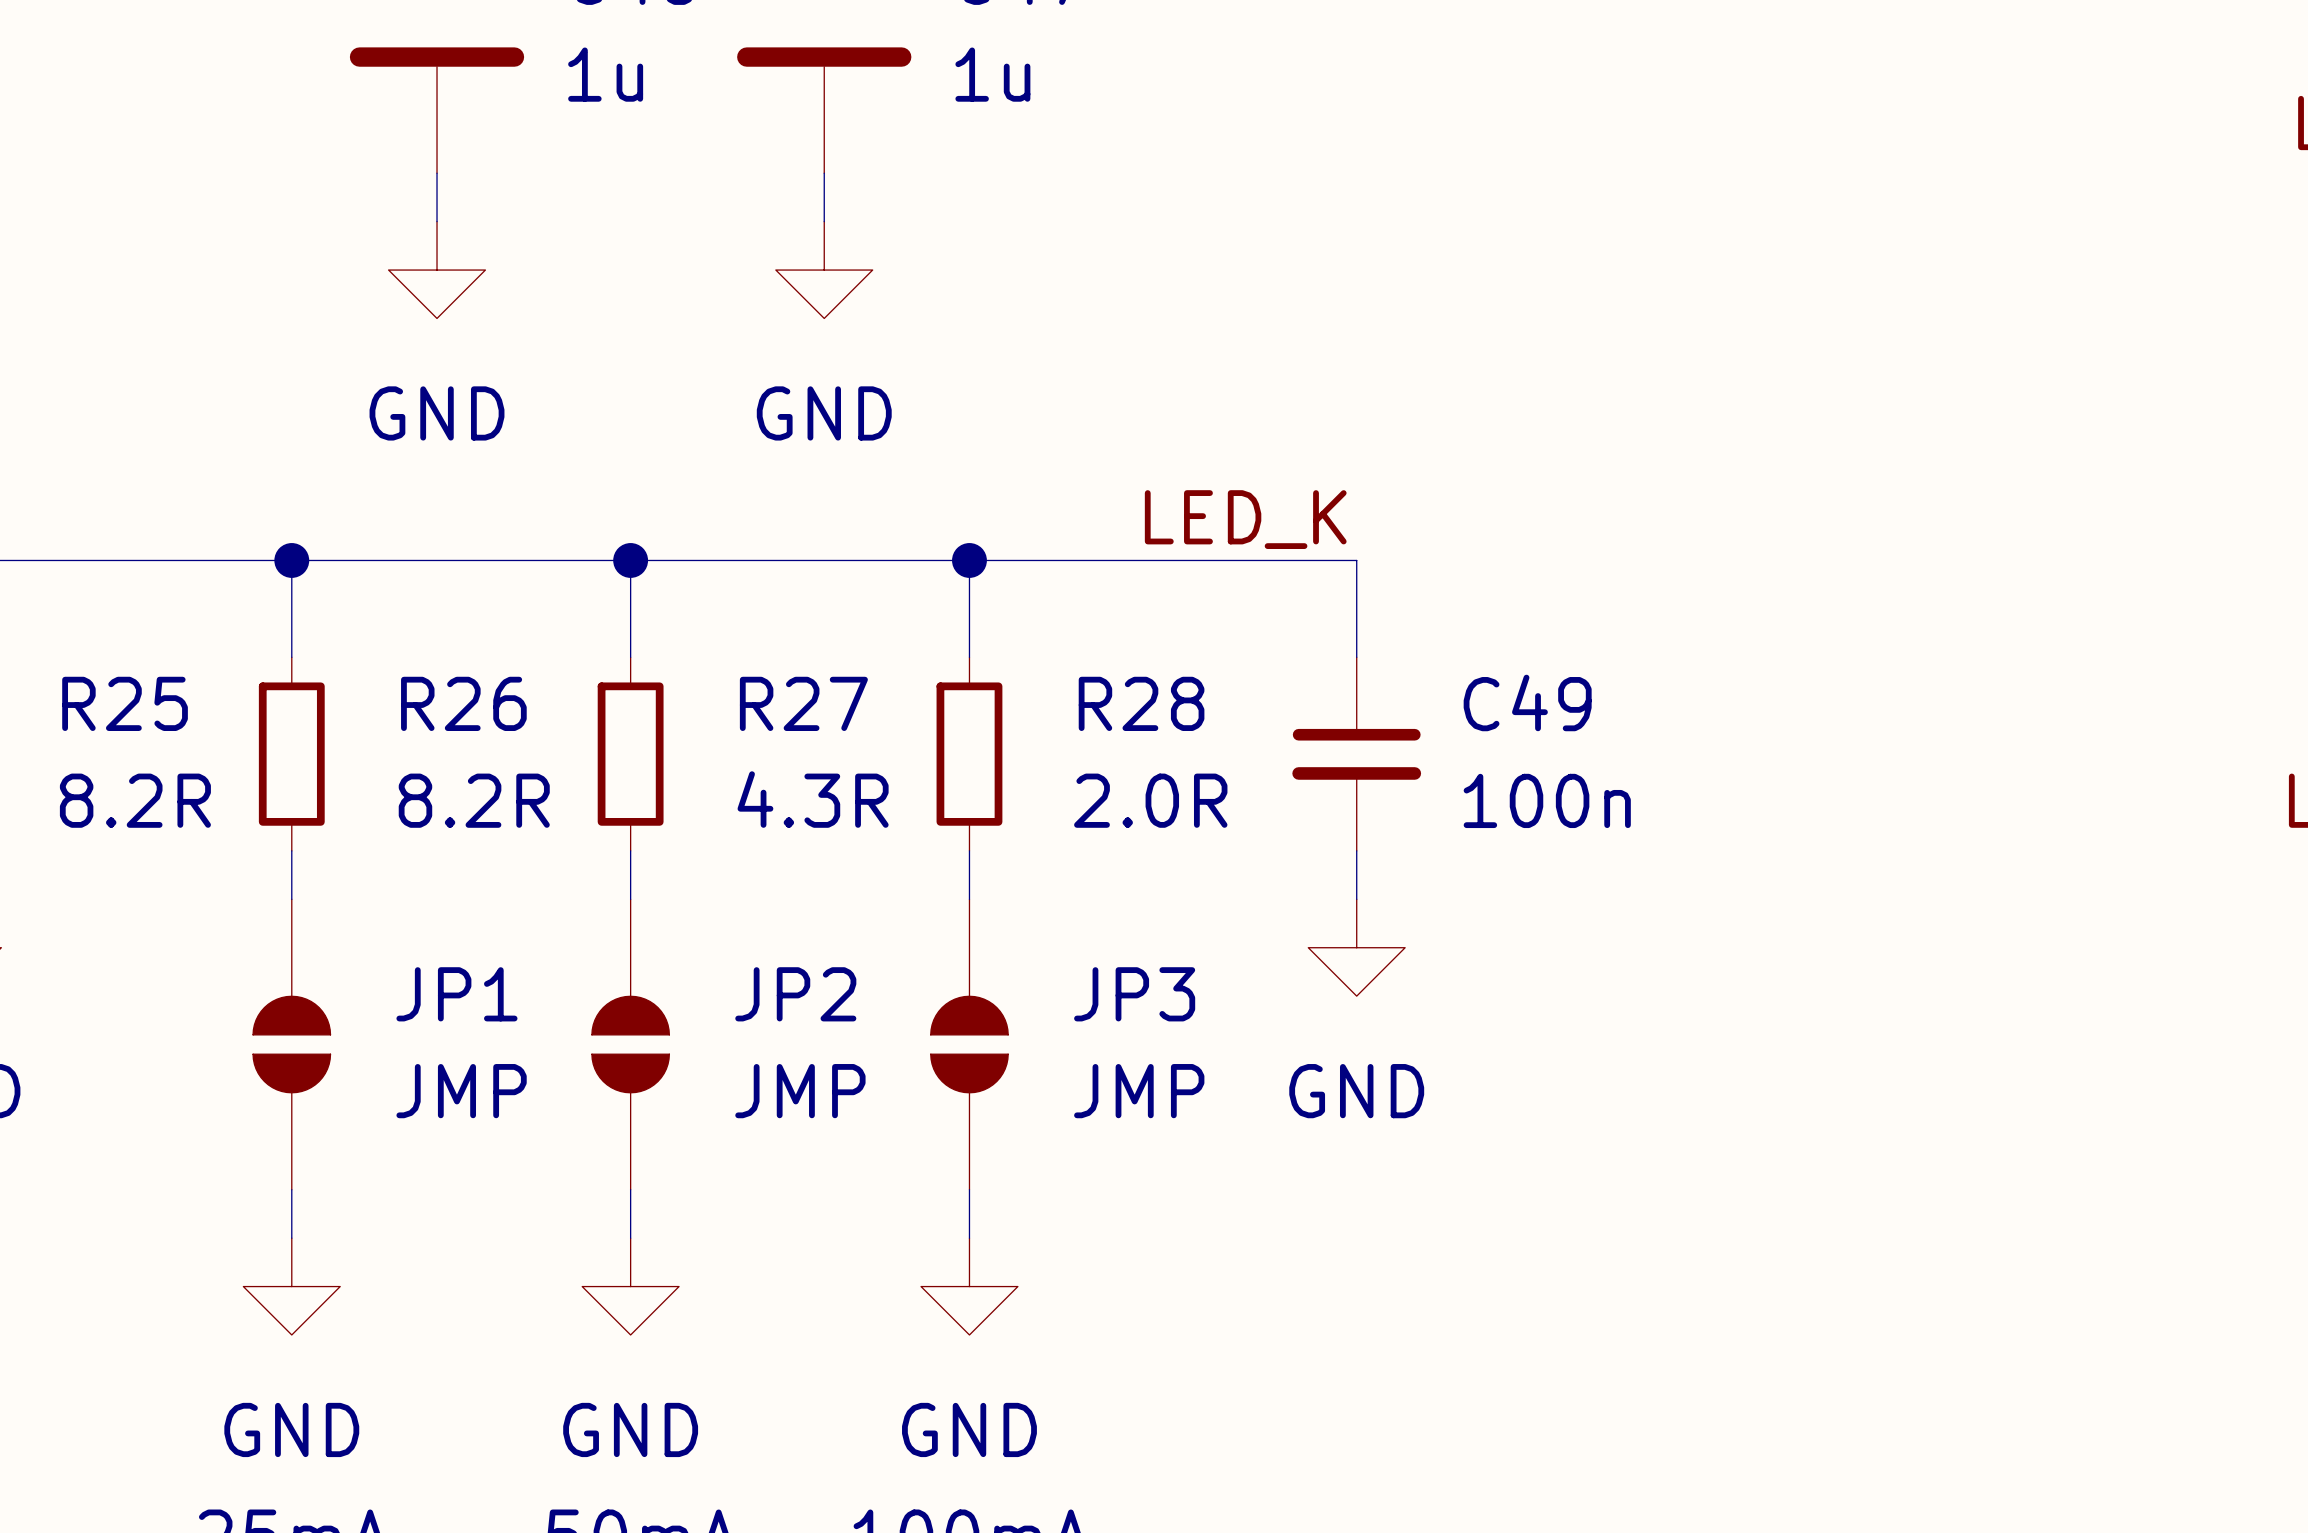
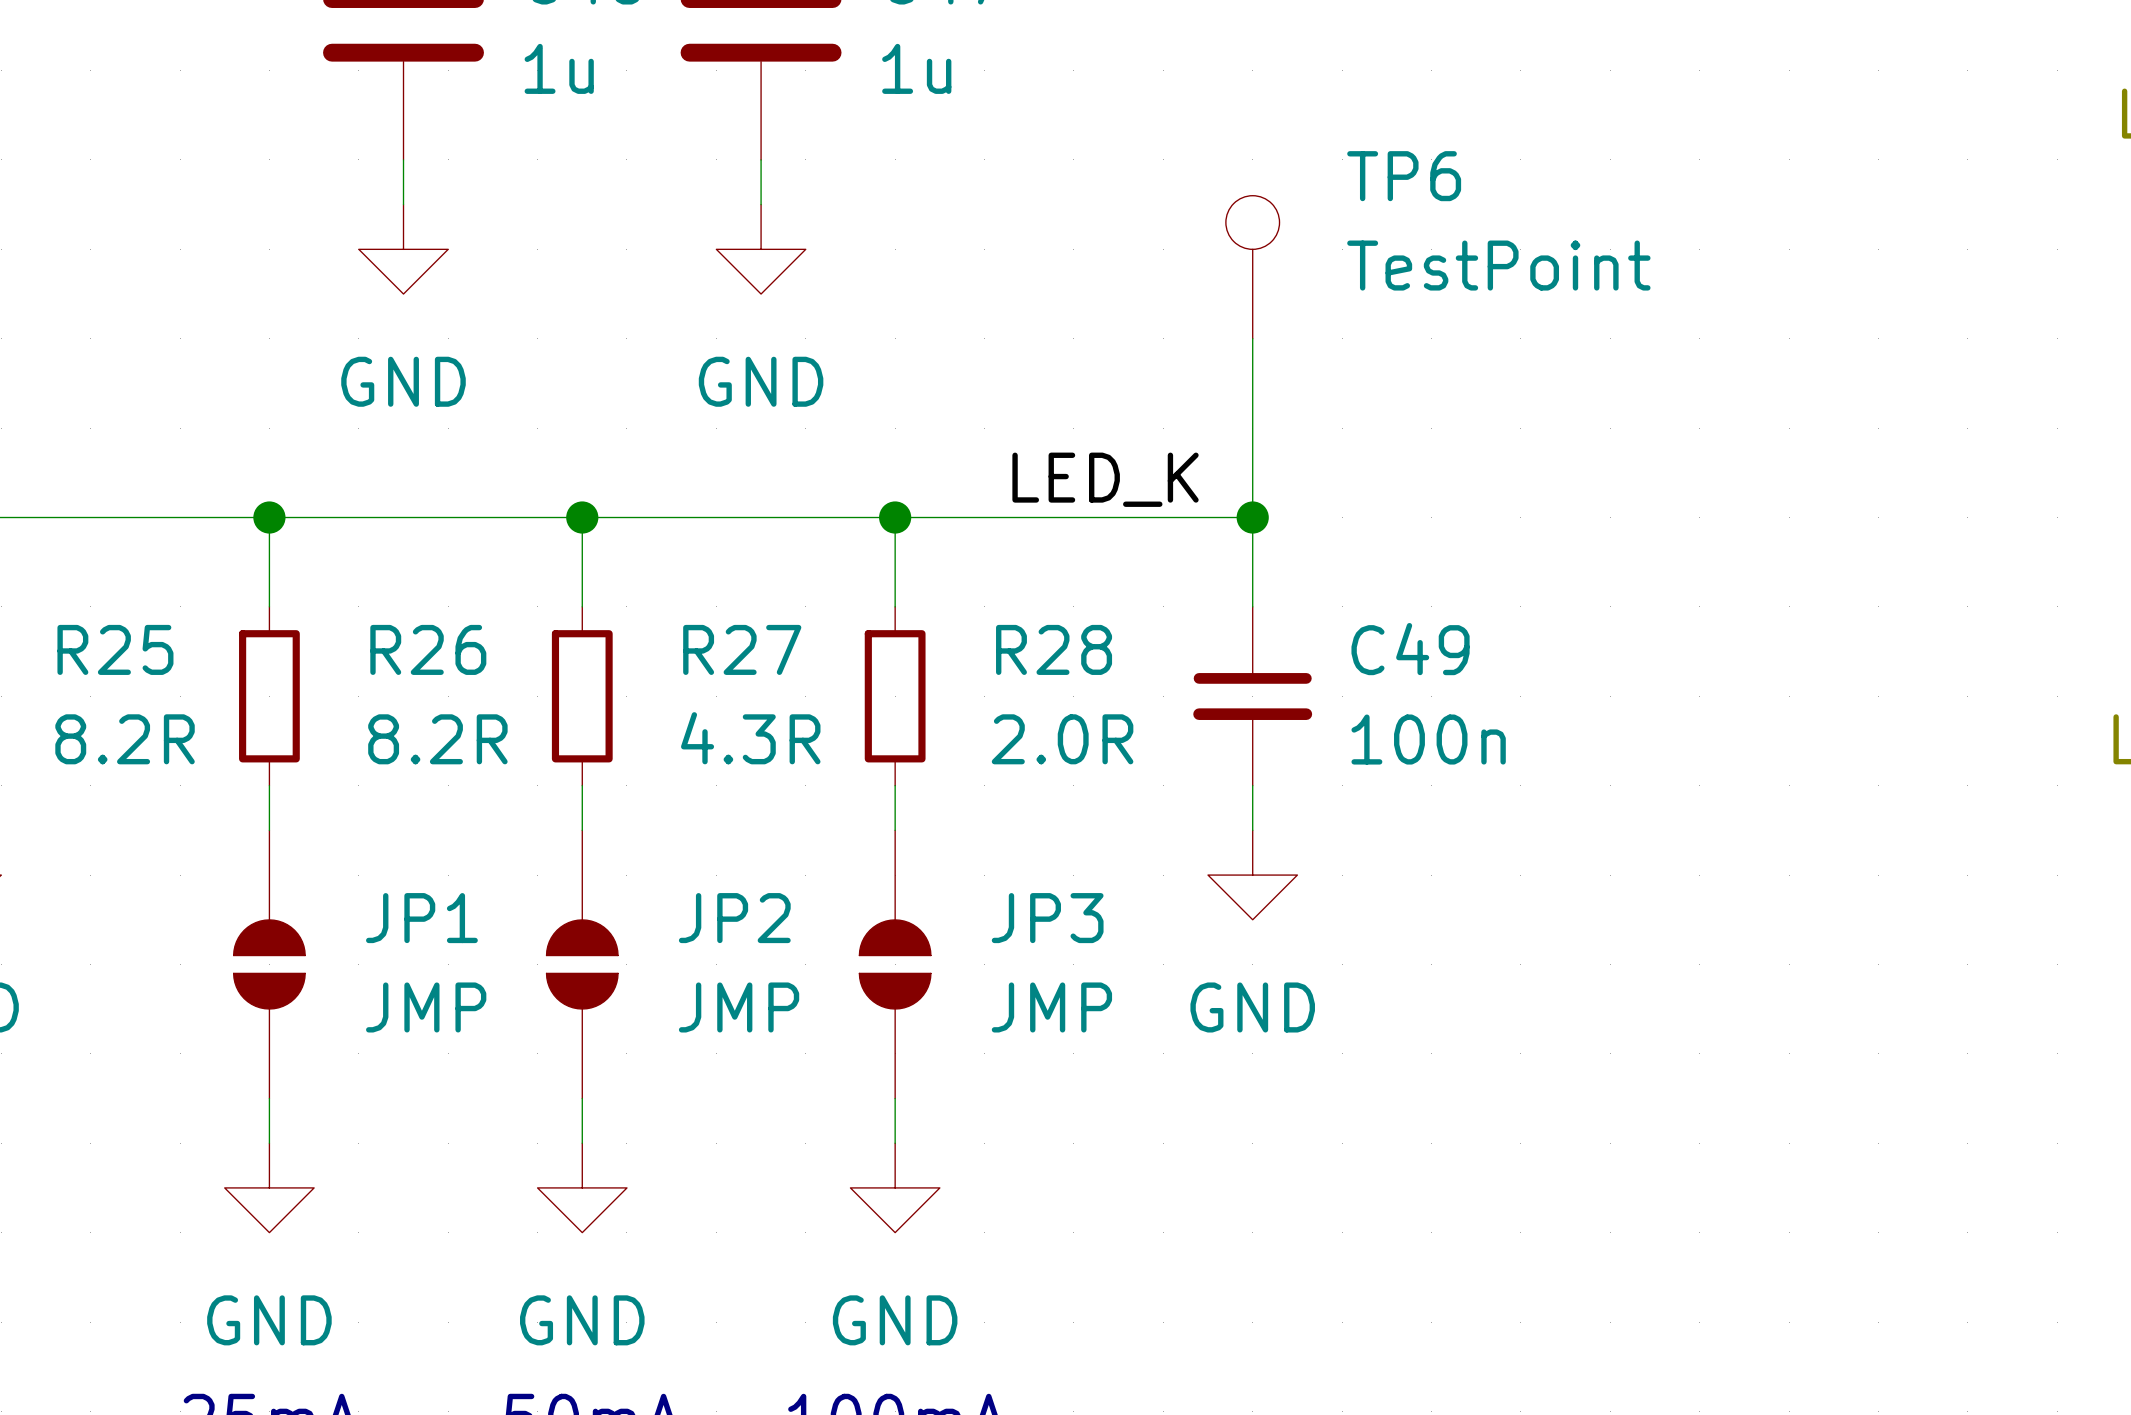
TP6: none -> TestPoint (1252, 267)
wire: none -> (1252, 338) (1252, 517)
label position: LED_K (1245, 519) -> LED_K (1105, 479)
junction: none -> (1252, 517)

